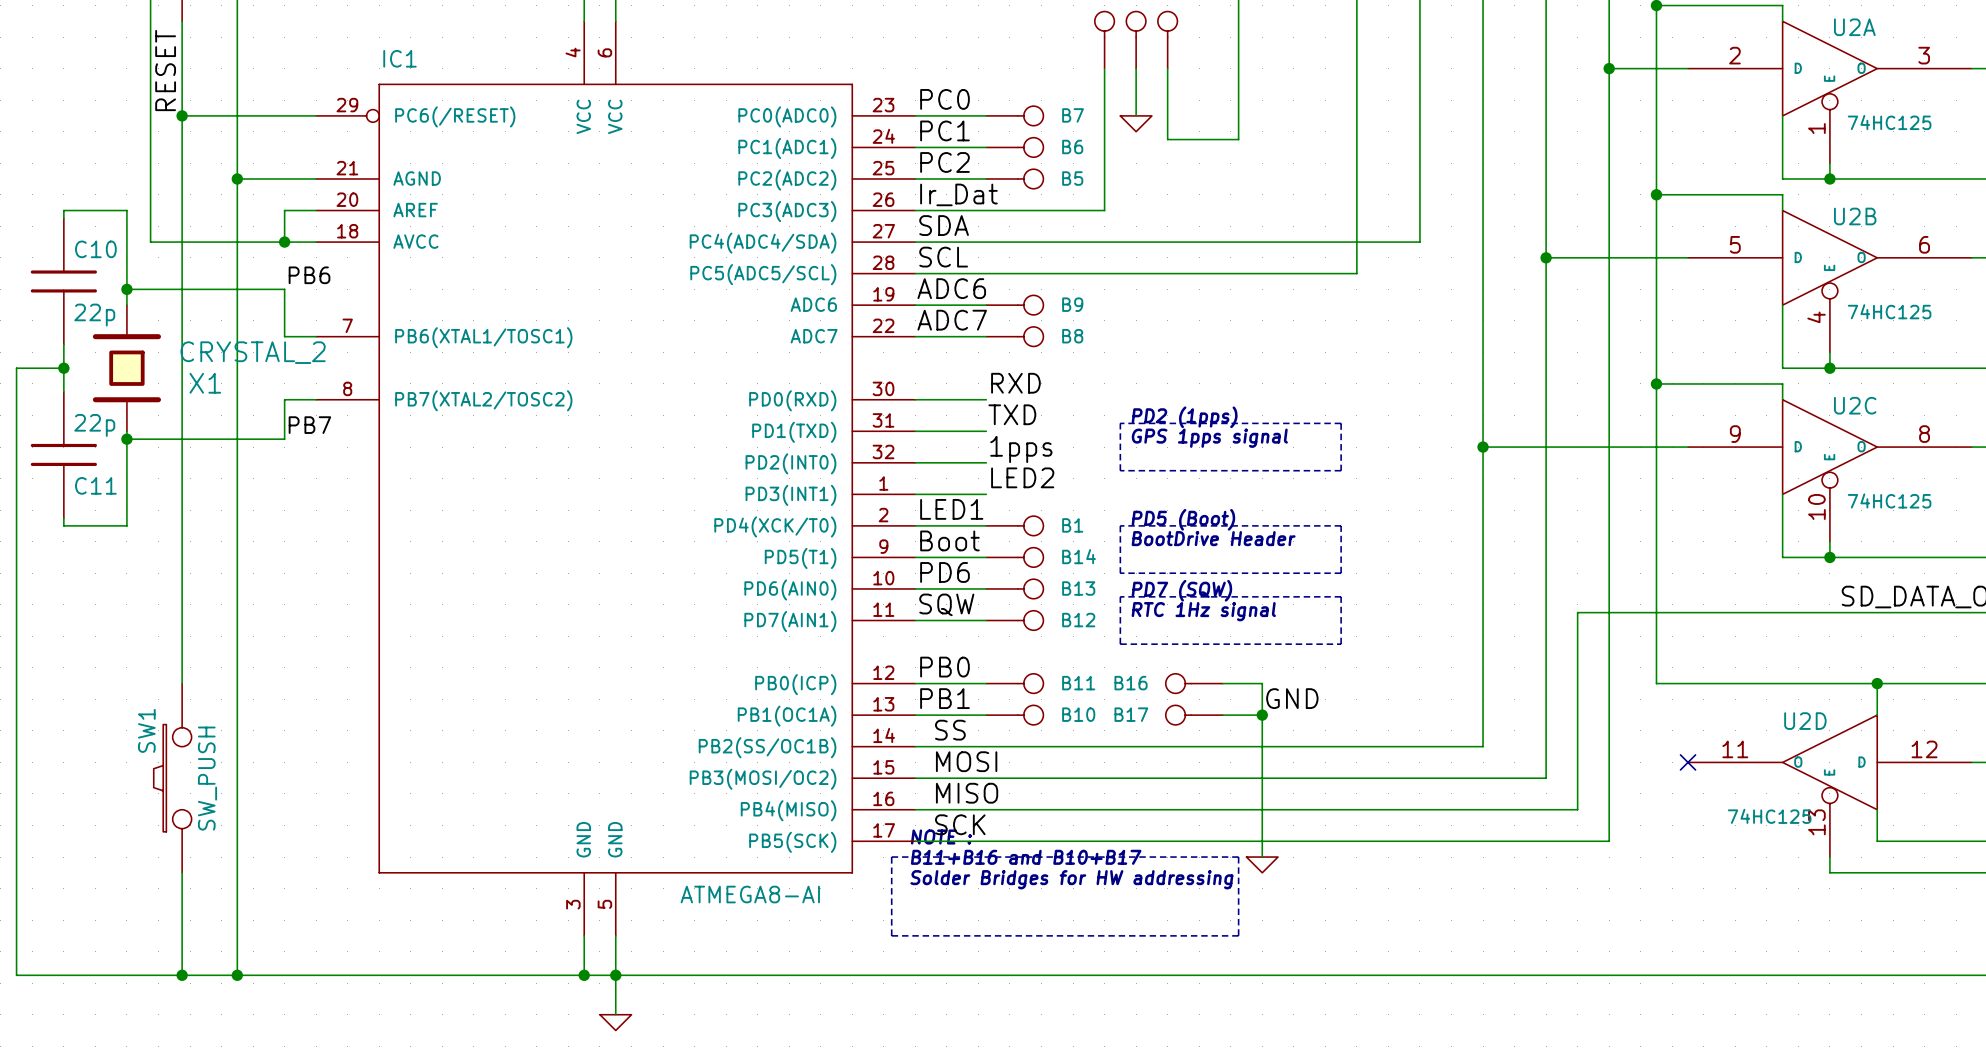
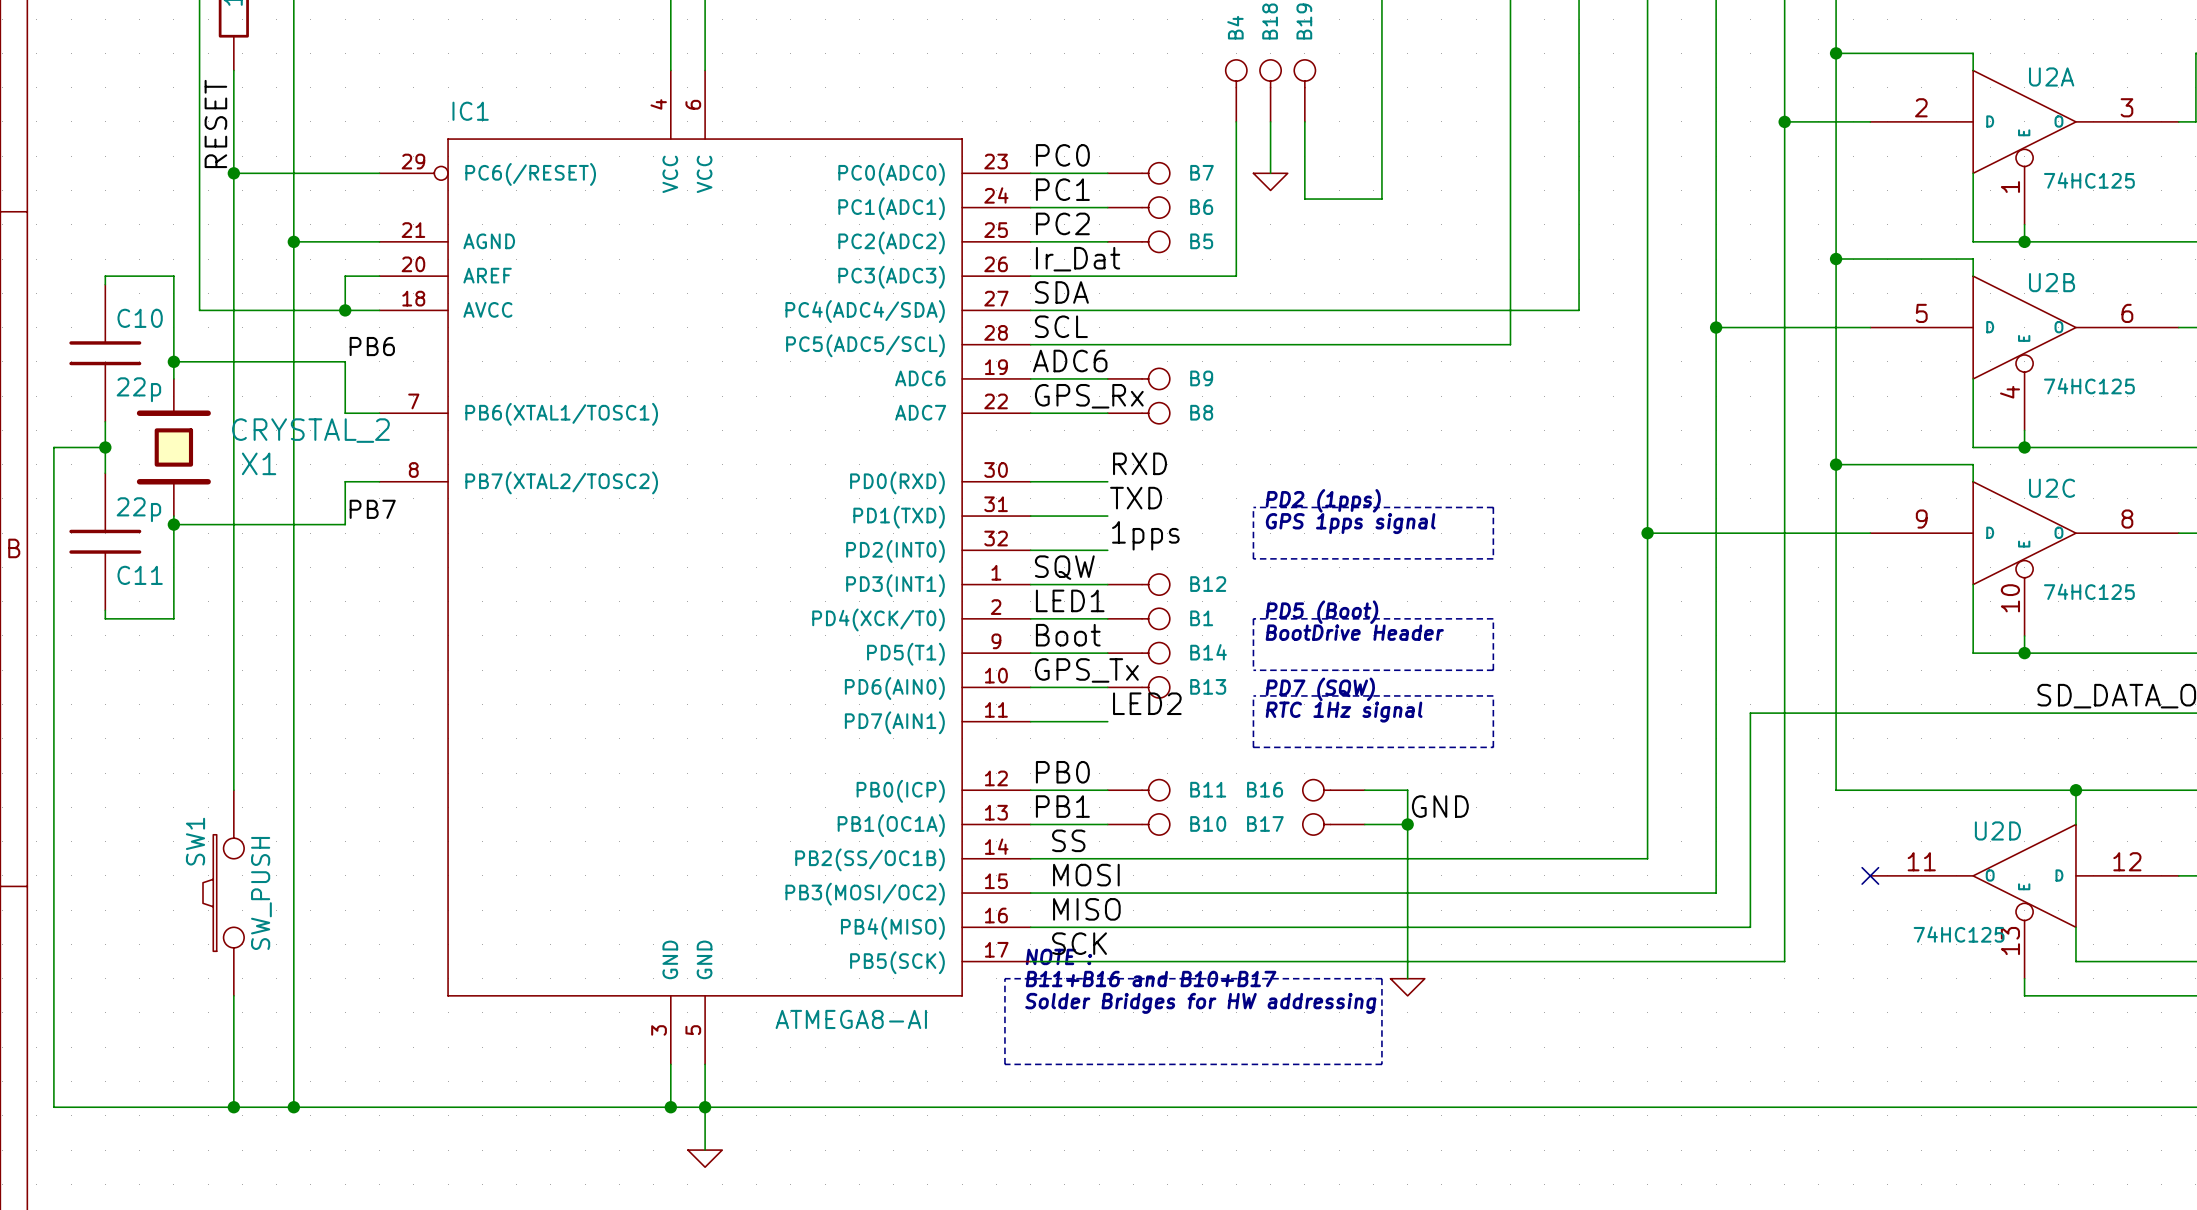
label: ADC7 (952, 320) -> GPS_Rx (1089, 396)
label position: LED2 (1022, 477) -> LED2 (1147, 703)
label: PD6 (944, 572) -> GPS_Tx (1086, 670)
label position: SQW (946, 604) -> SQW (1064, 567)
B12 position: (1014, 620) -> (1138, 584)

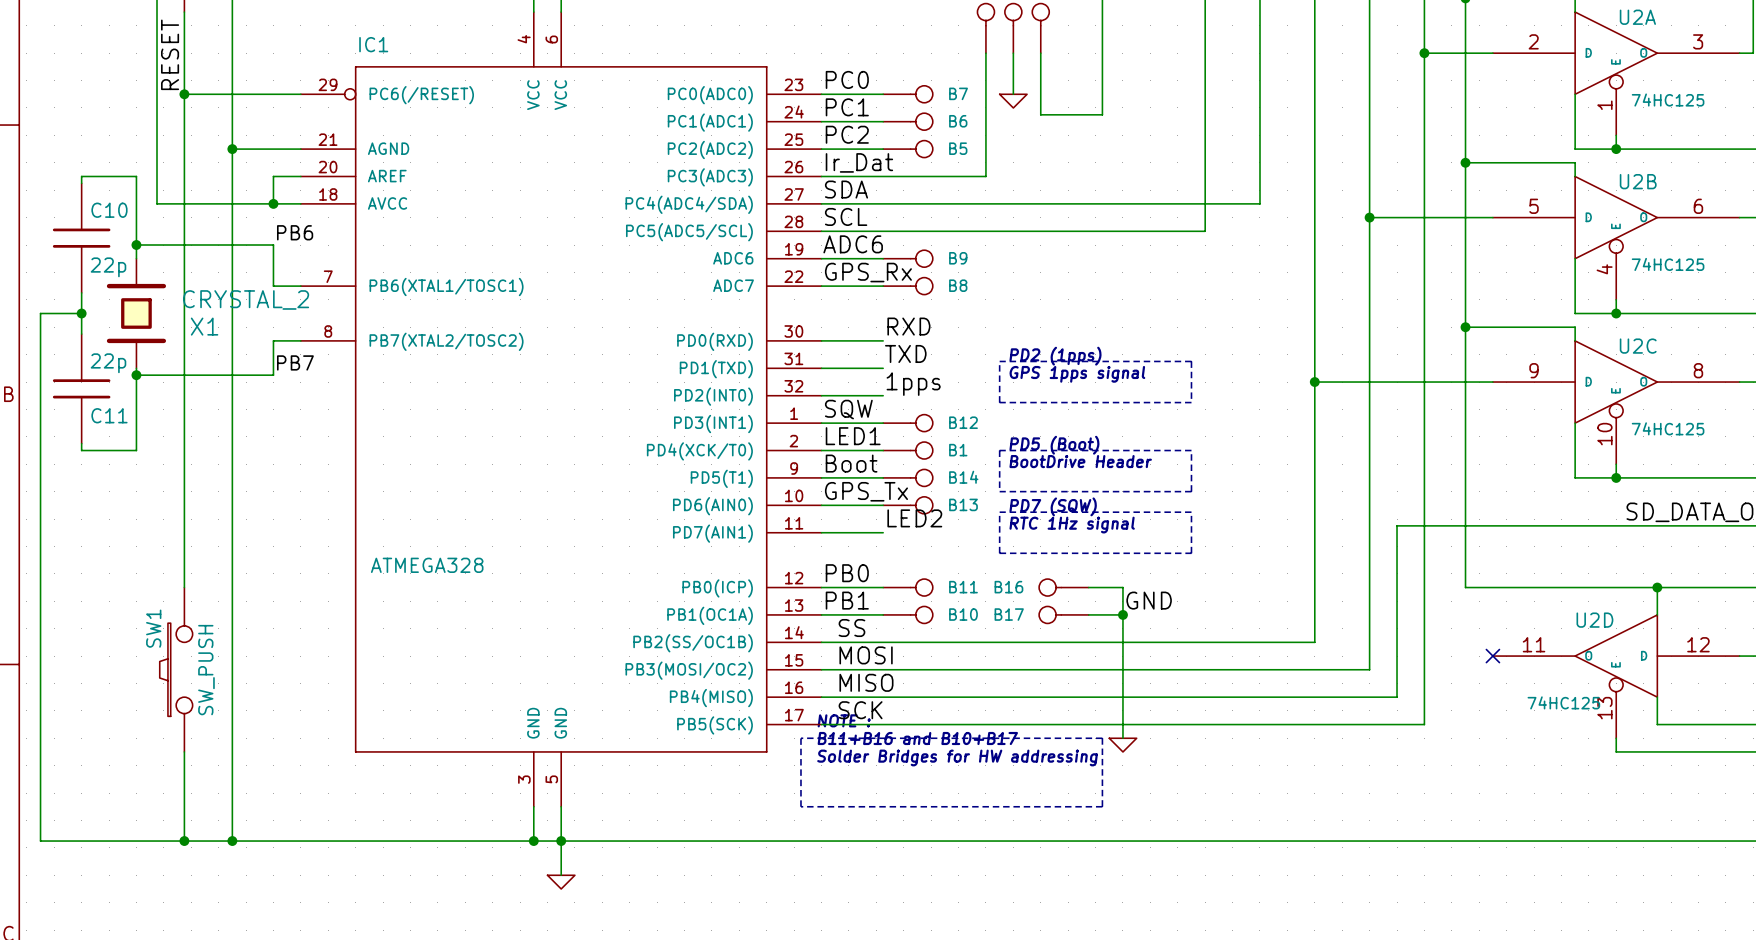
IC1 value: ATMEGA8-AI (851, 1019) -> ATMEGA328 (427, 565)

